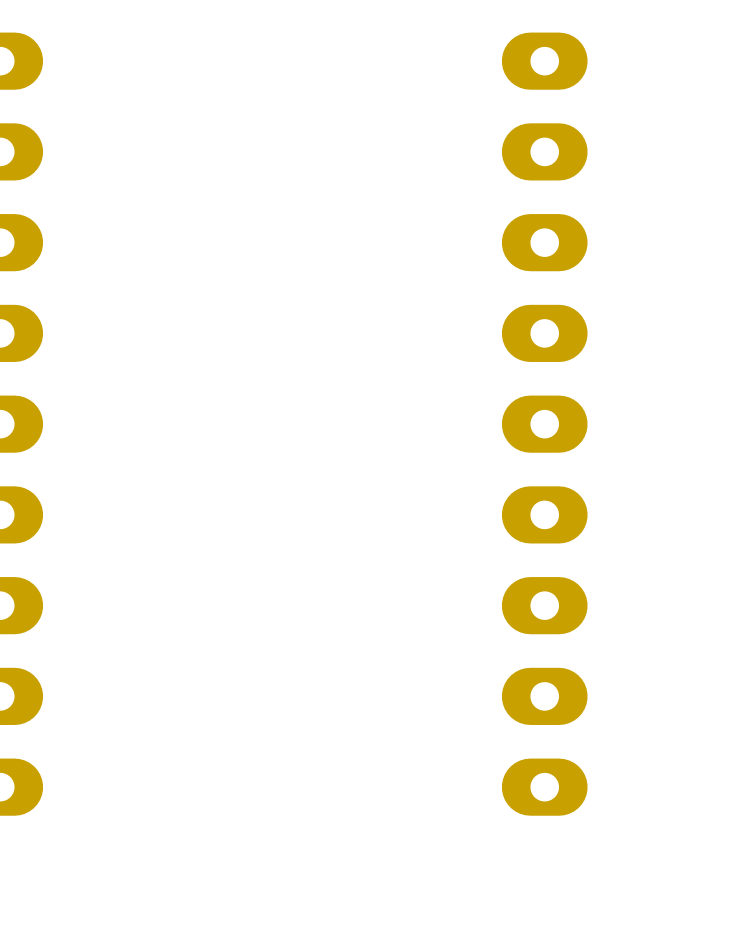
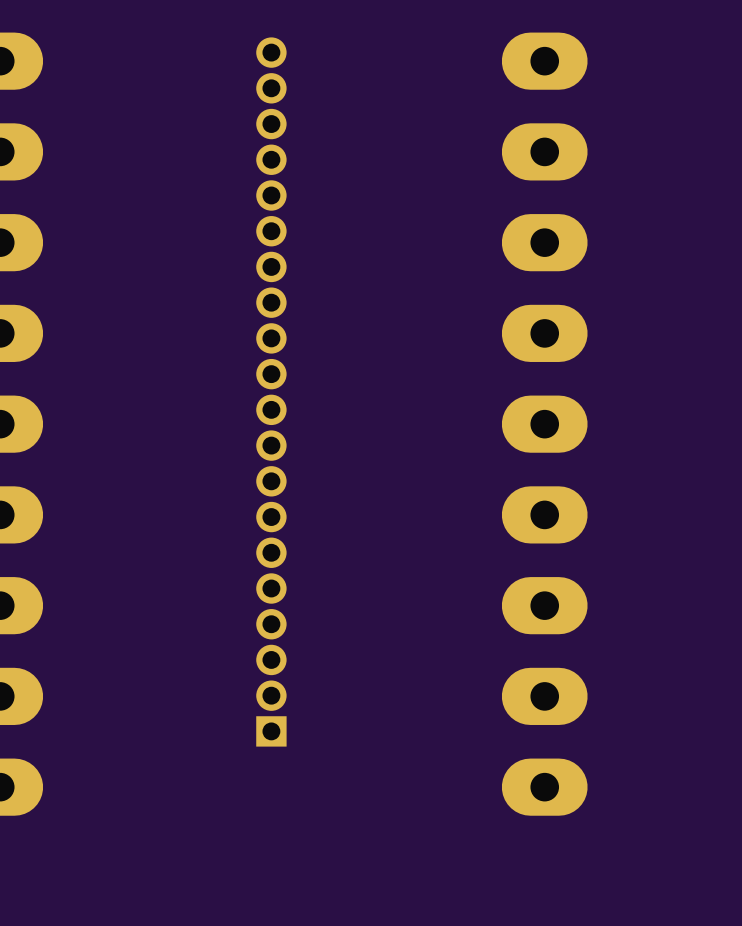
part: none -> (271, 392)

